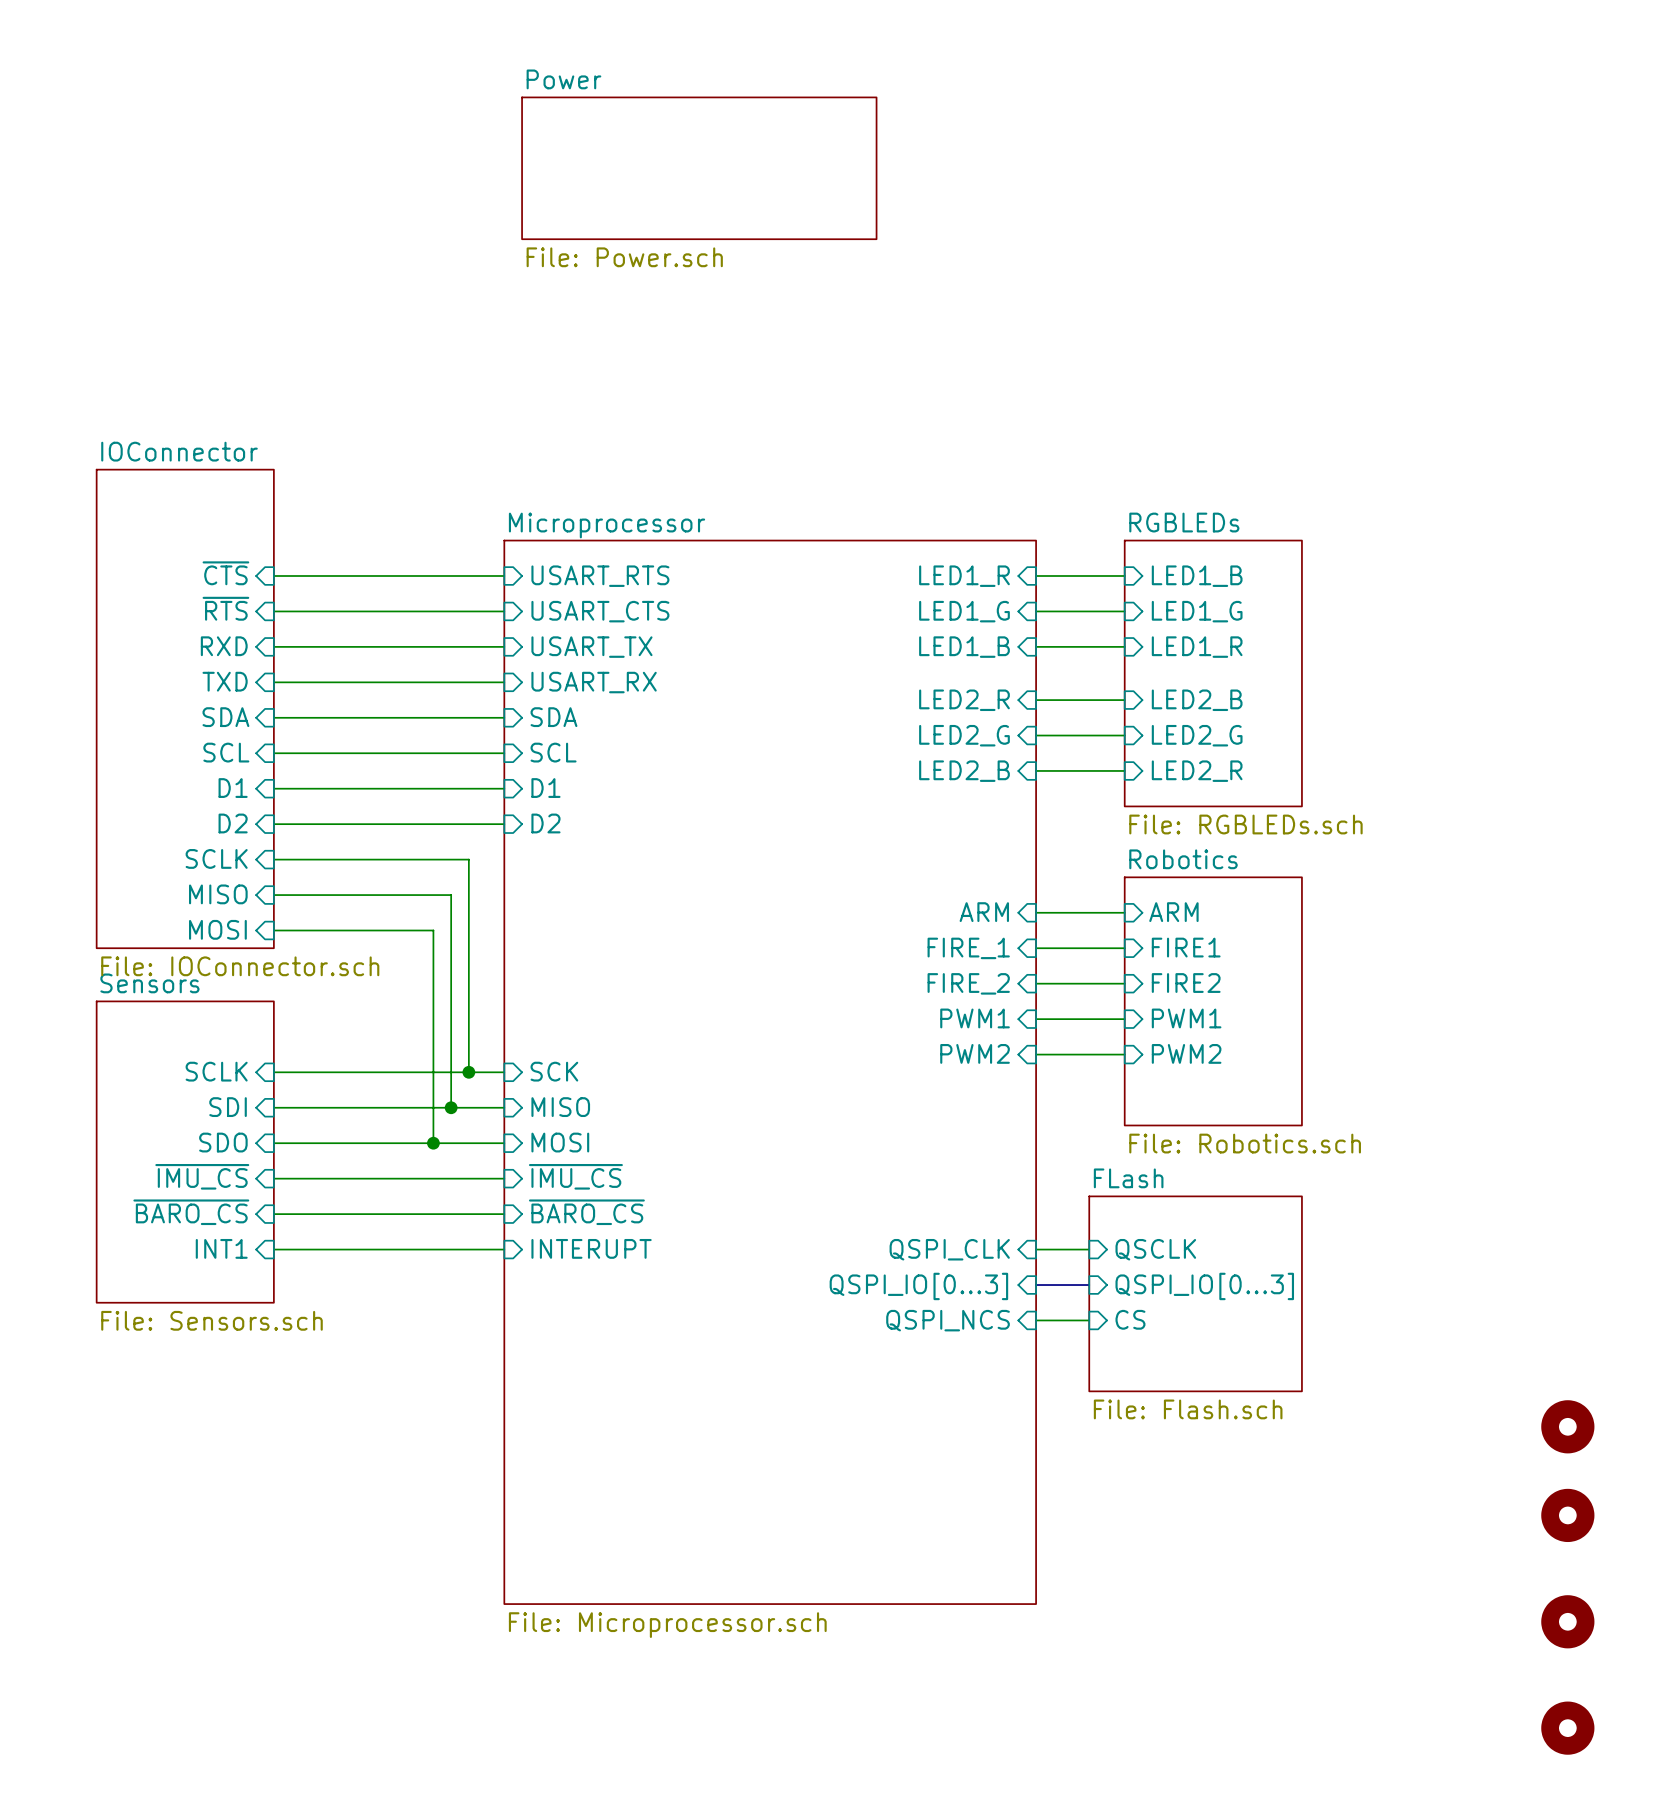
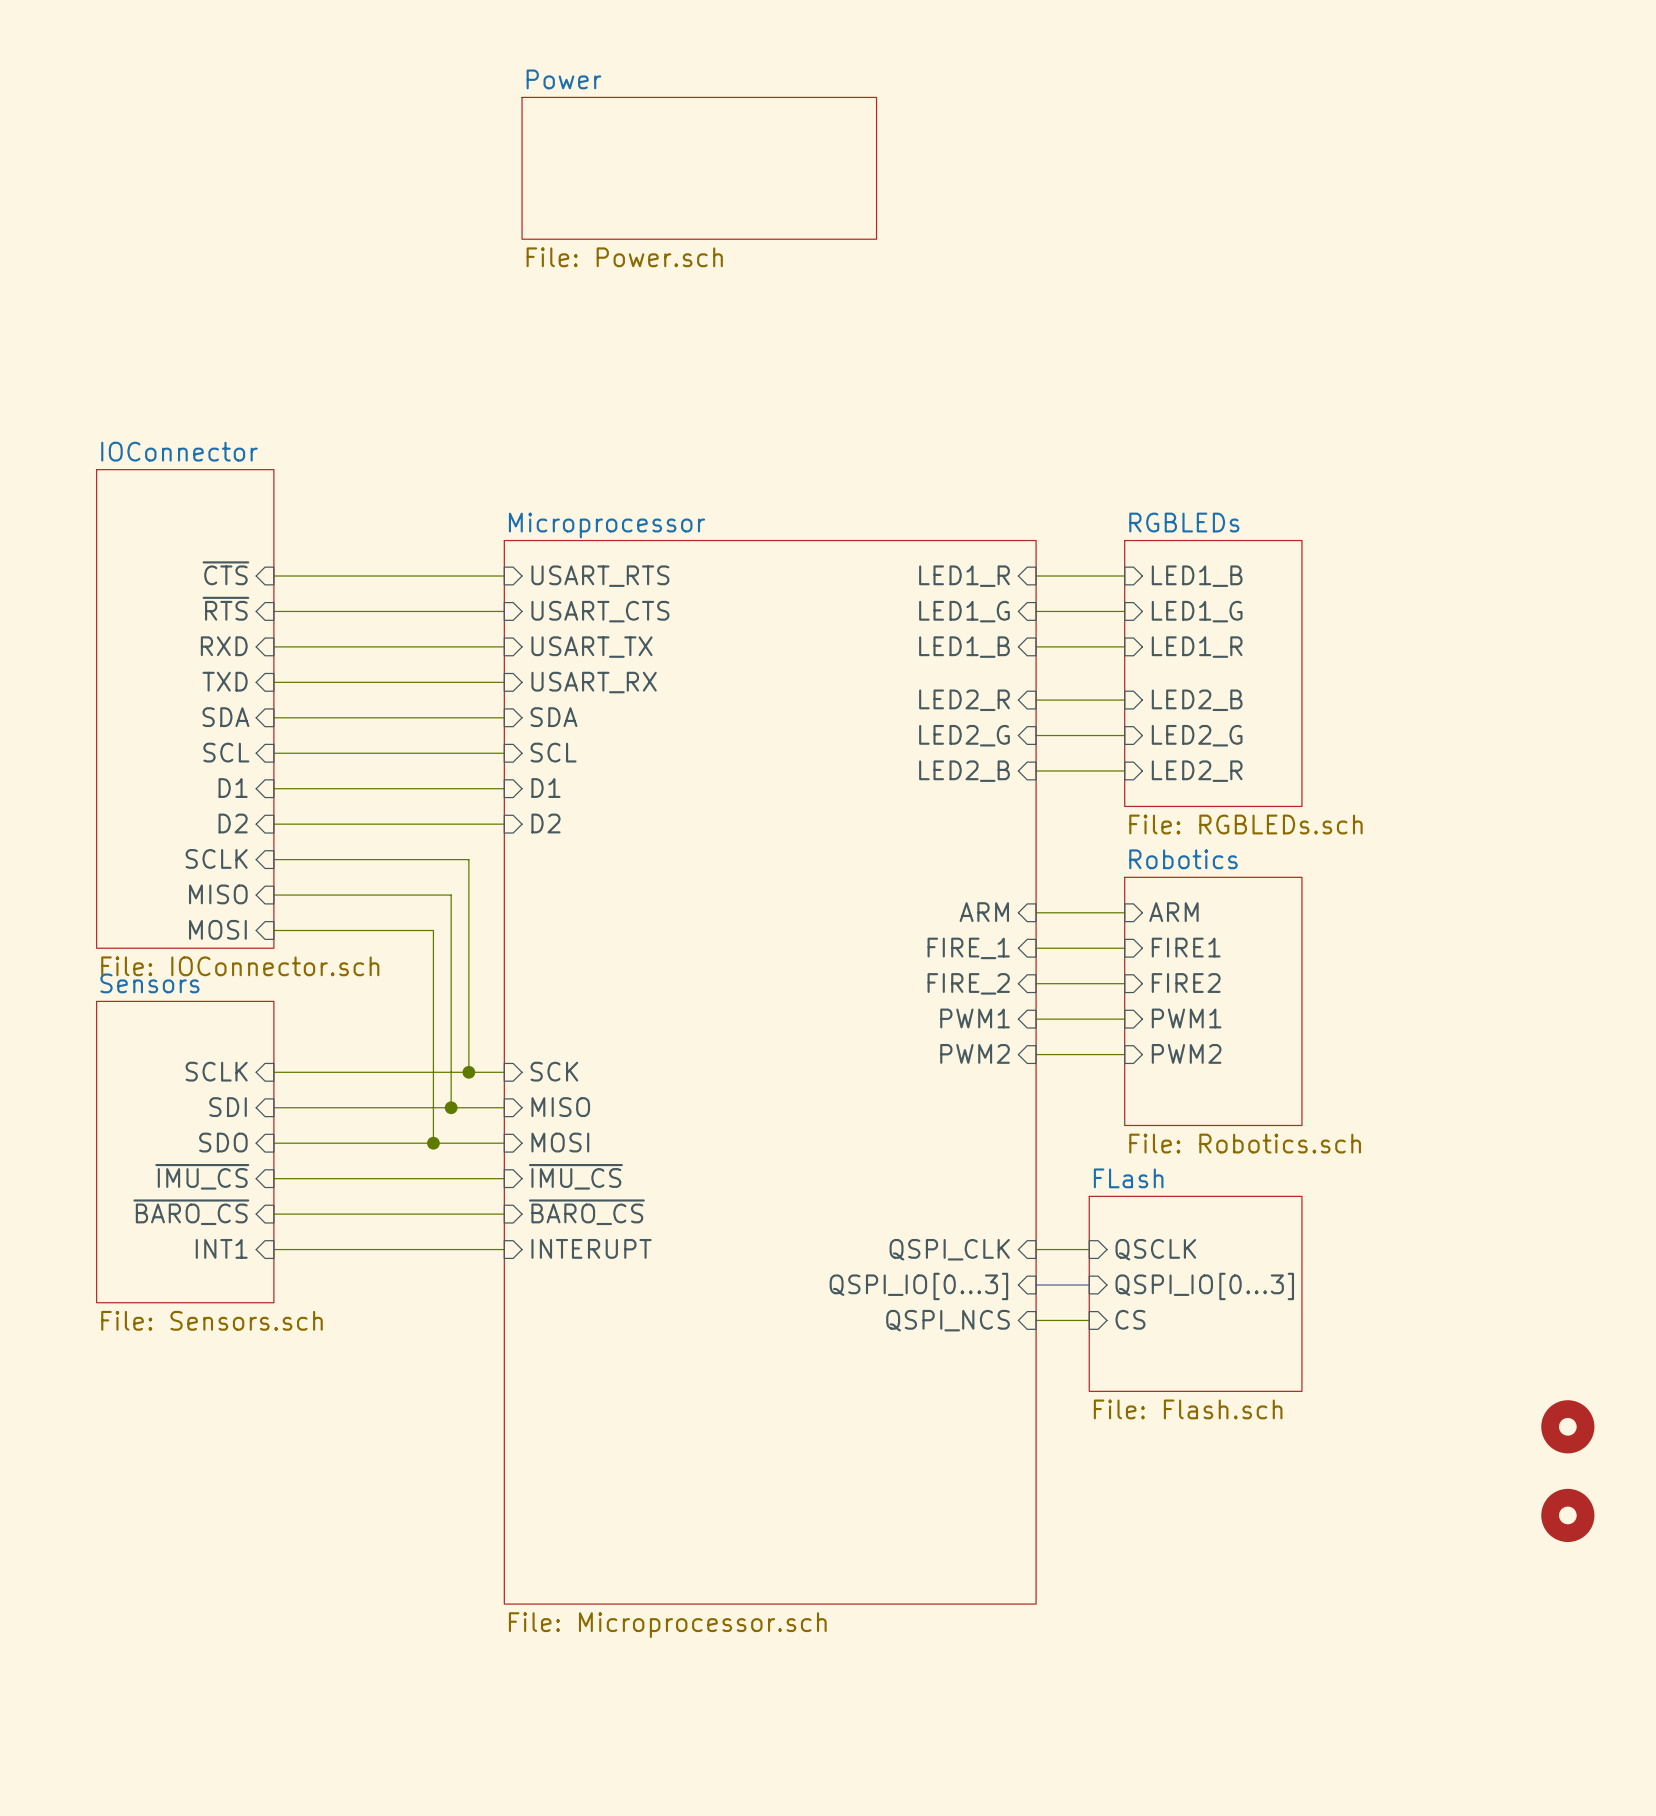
part: (1567, 1621) -> none
part: (1567, 1728) -> none

